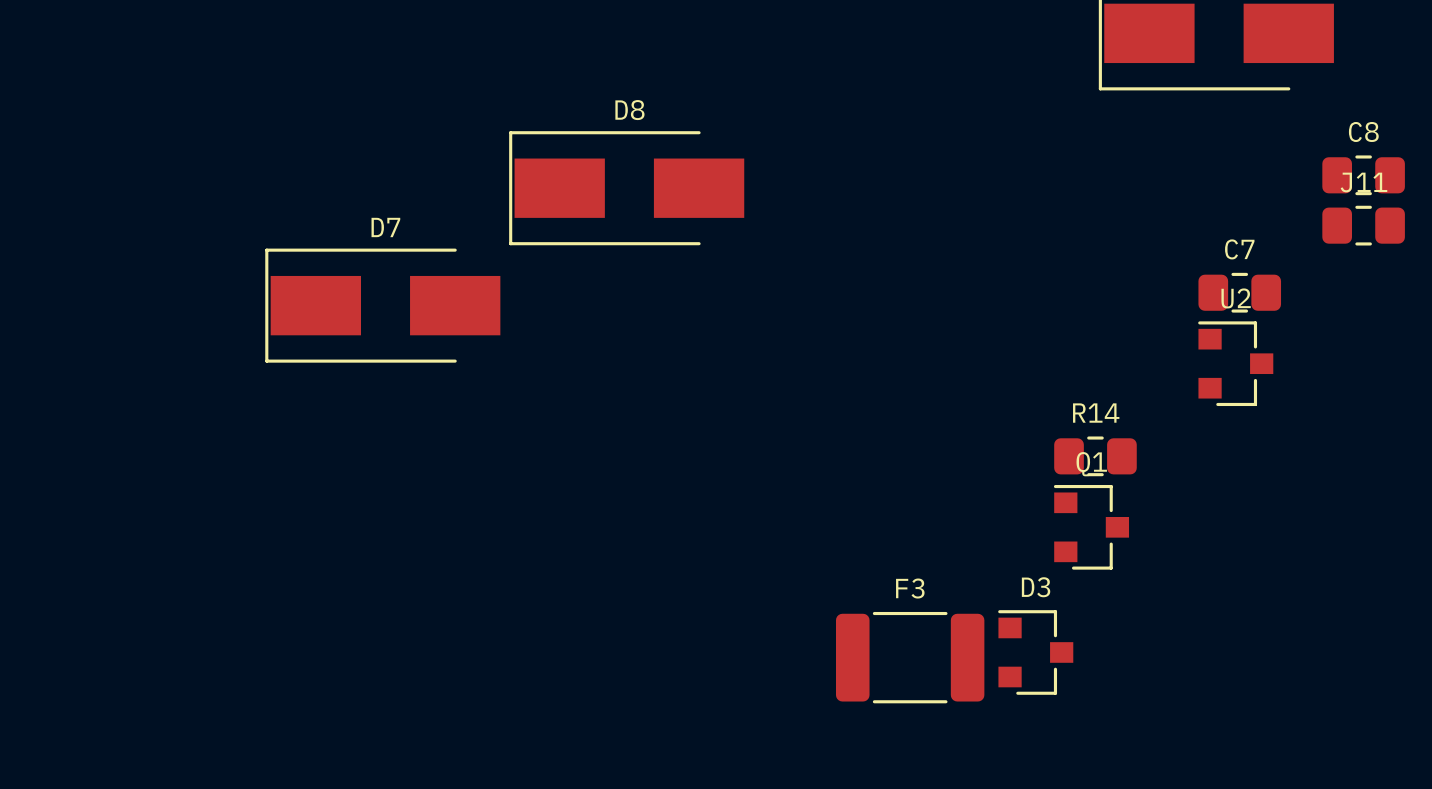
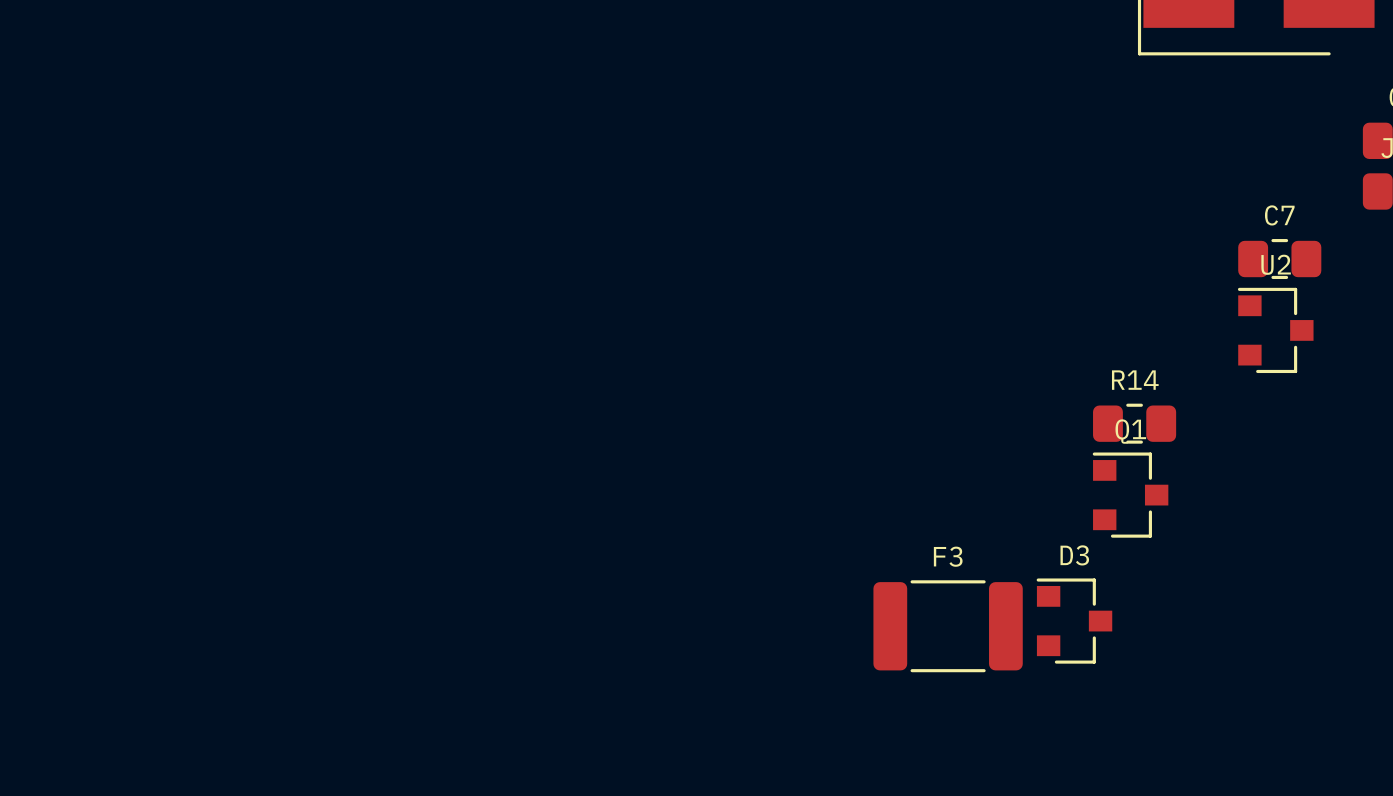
D8: (626, 188) -> none
D7: (382, 305) -> none

